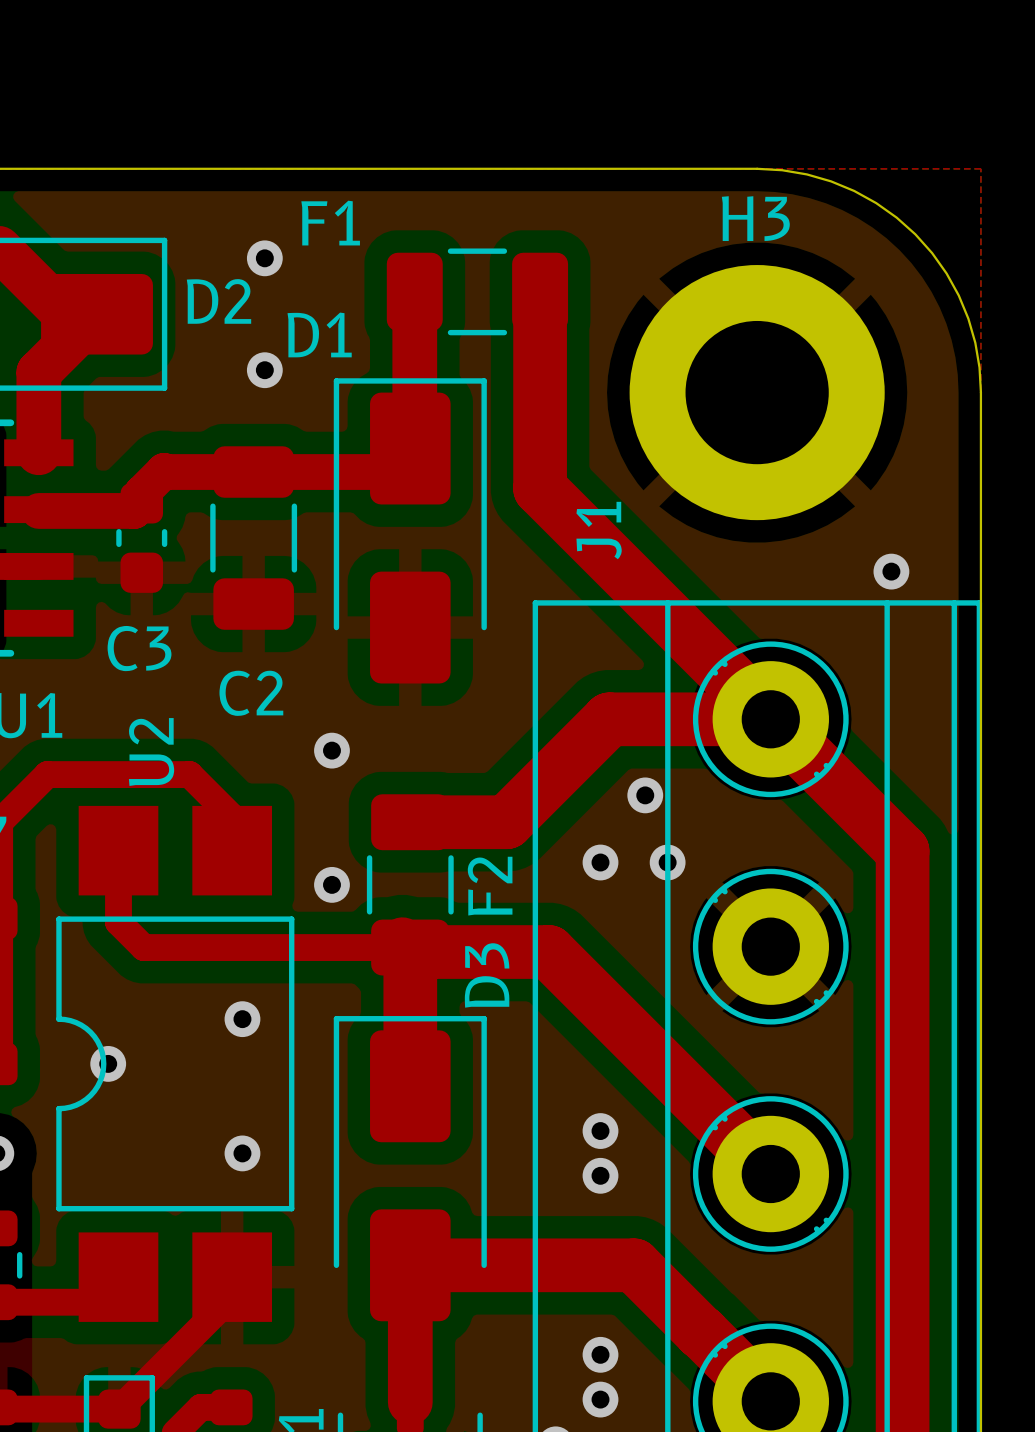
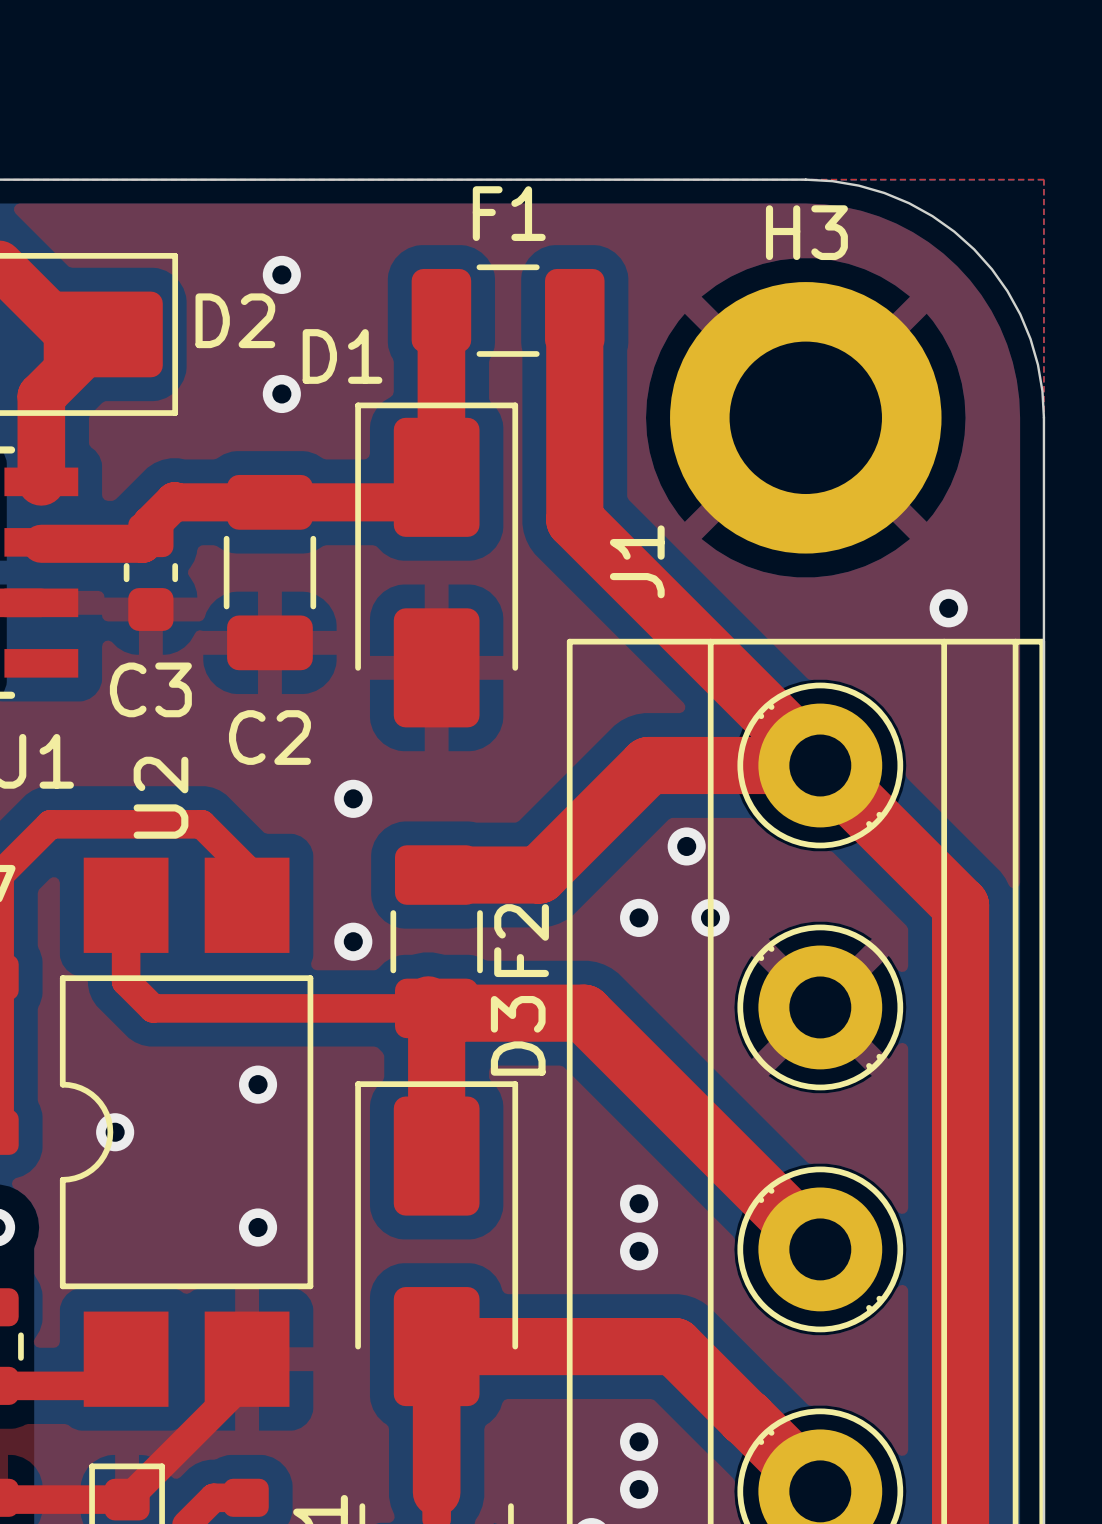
F1 name position: F1 (330, 223) -> F1 (509, 213)

